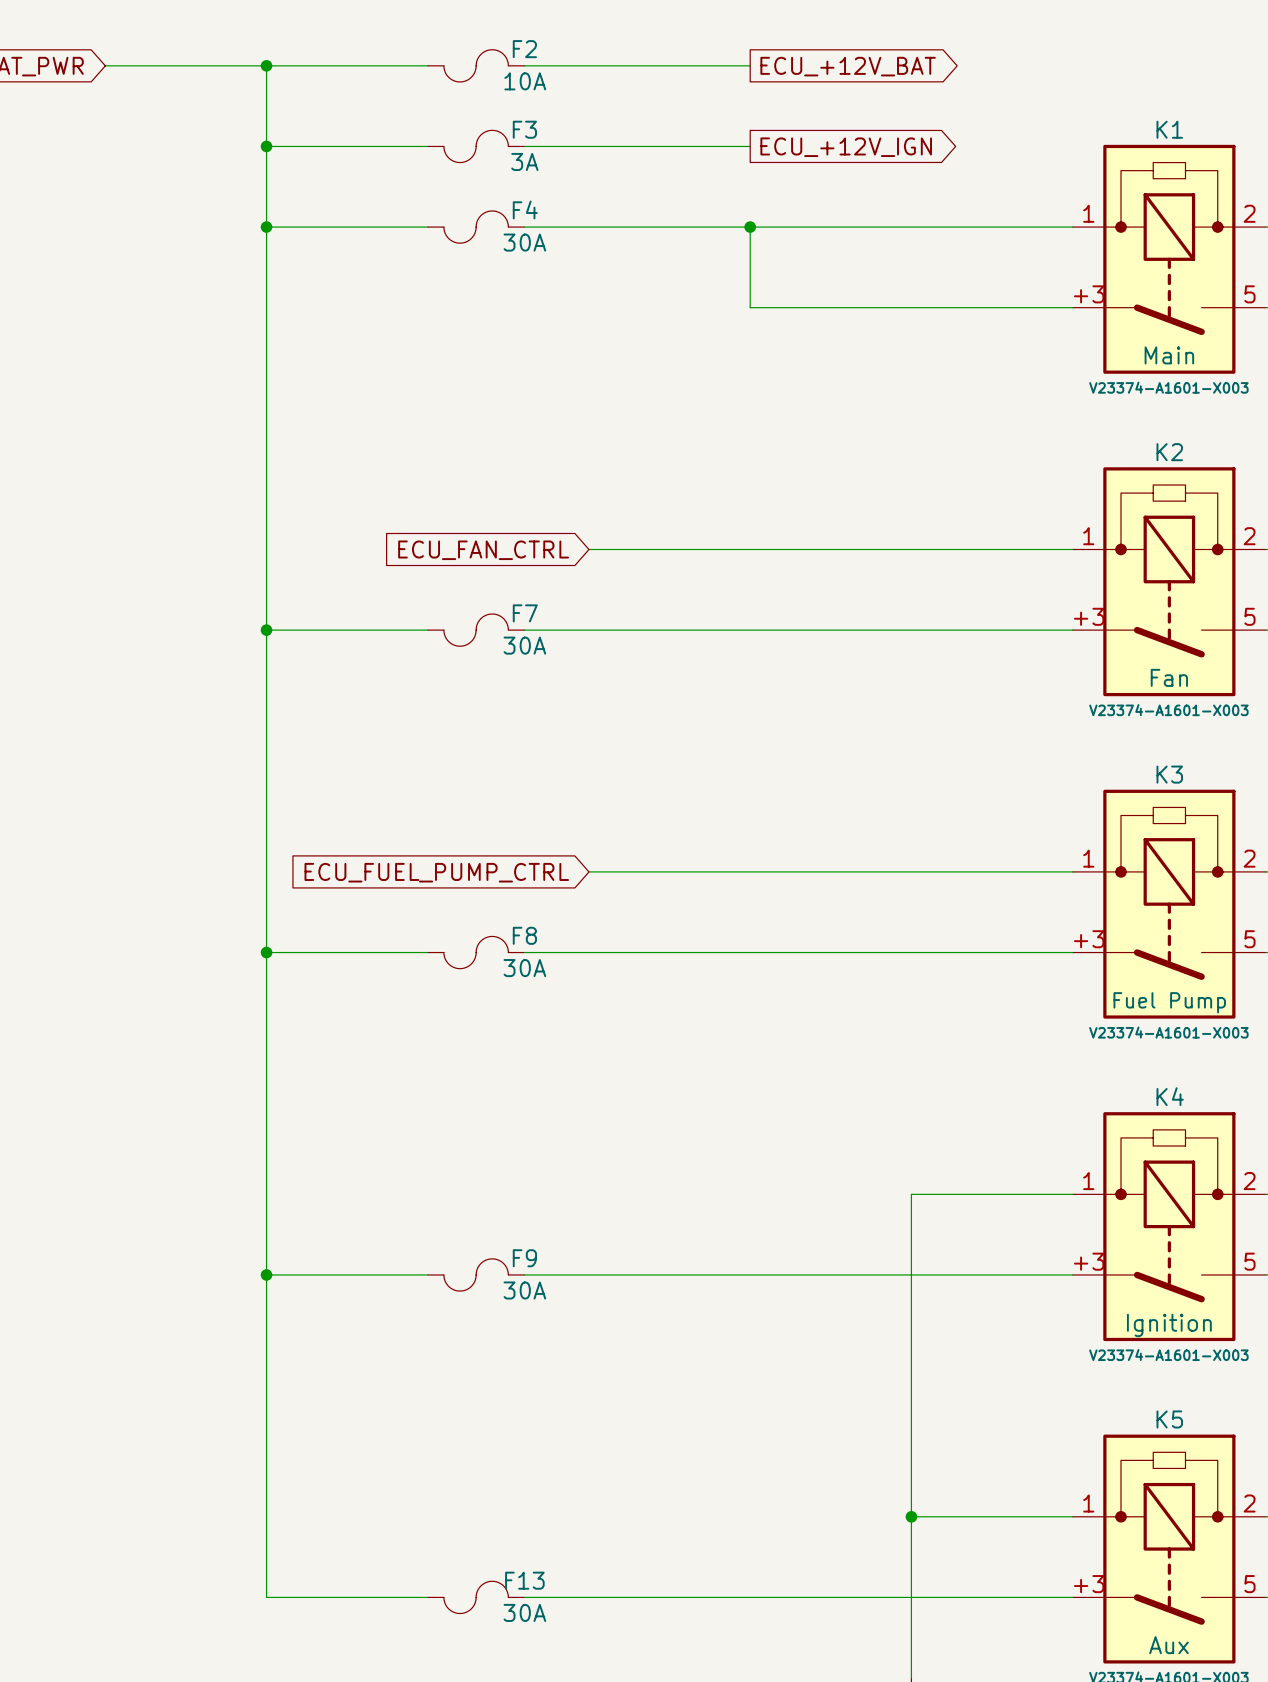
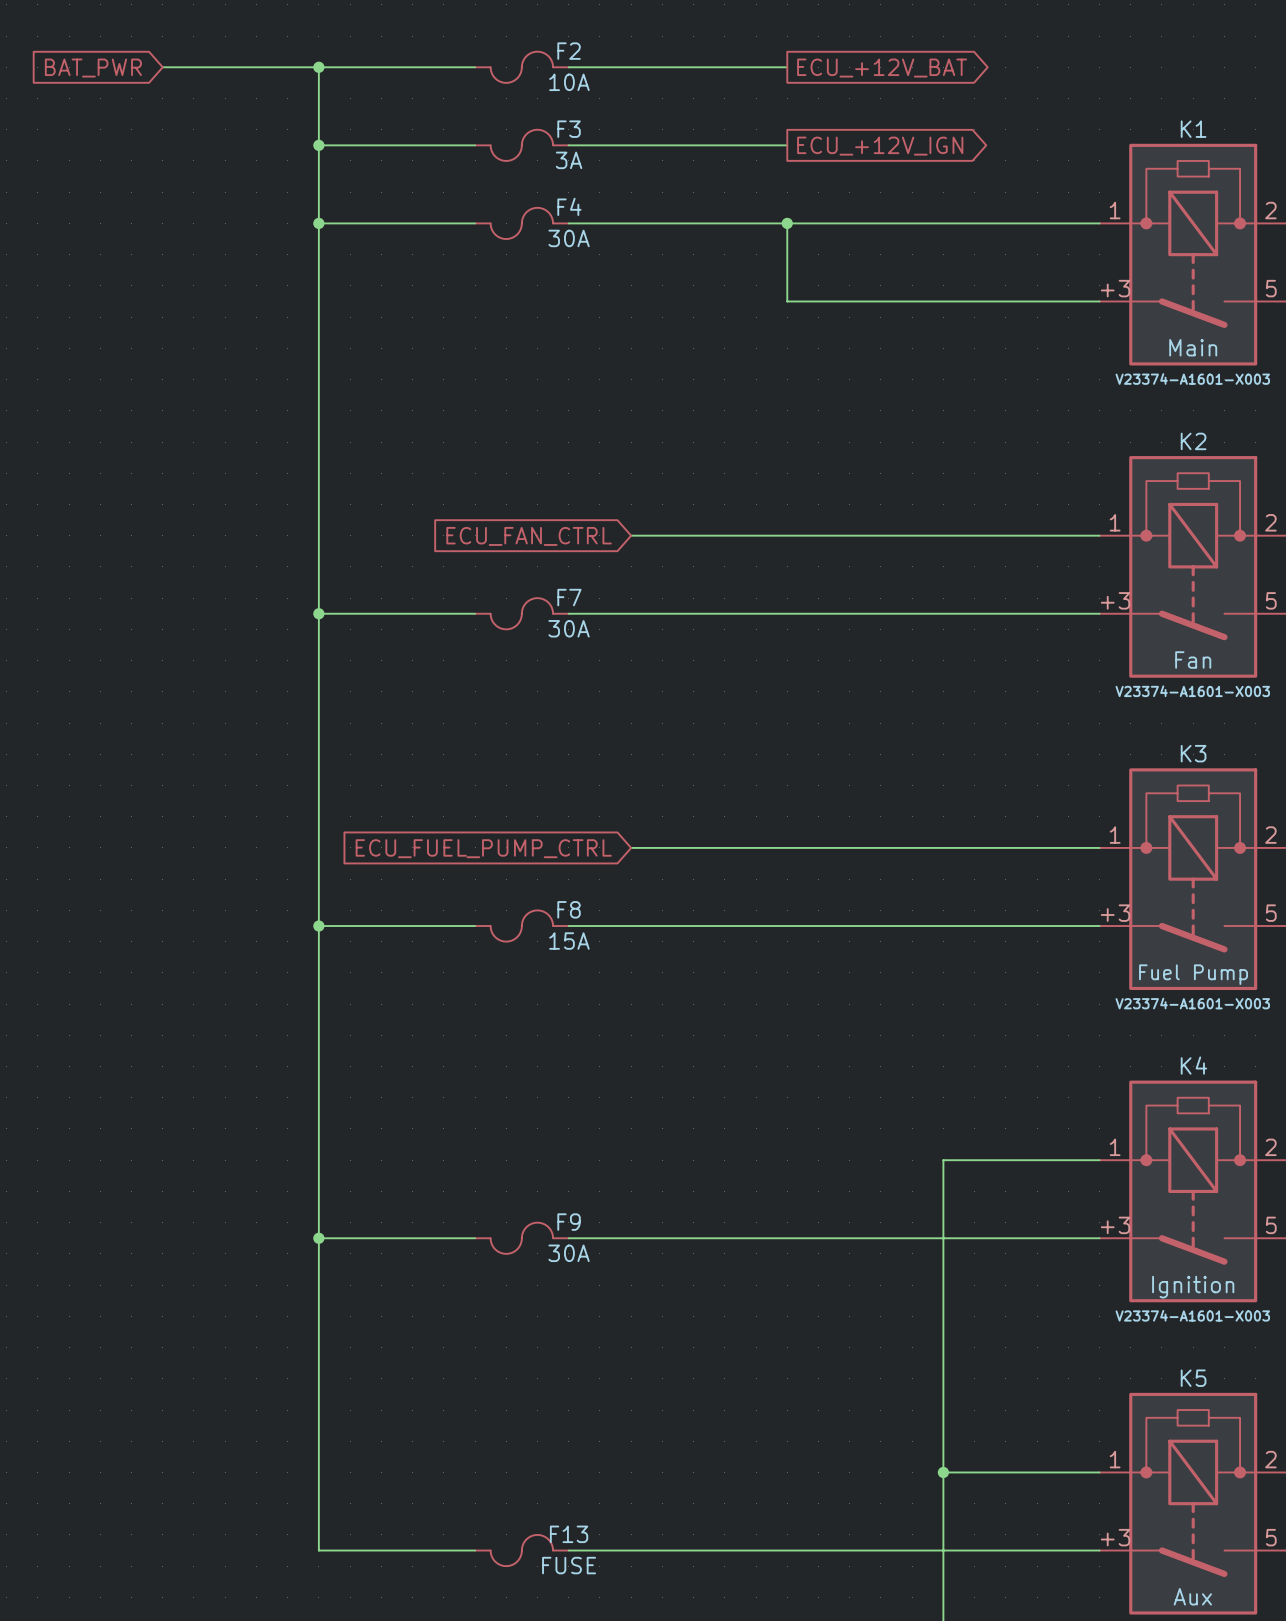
F8 value: 30A (524, 968) -> 15A (569, 941)
F13 value: 30A (524, 1612) -> FUSE (569, 1565)

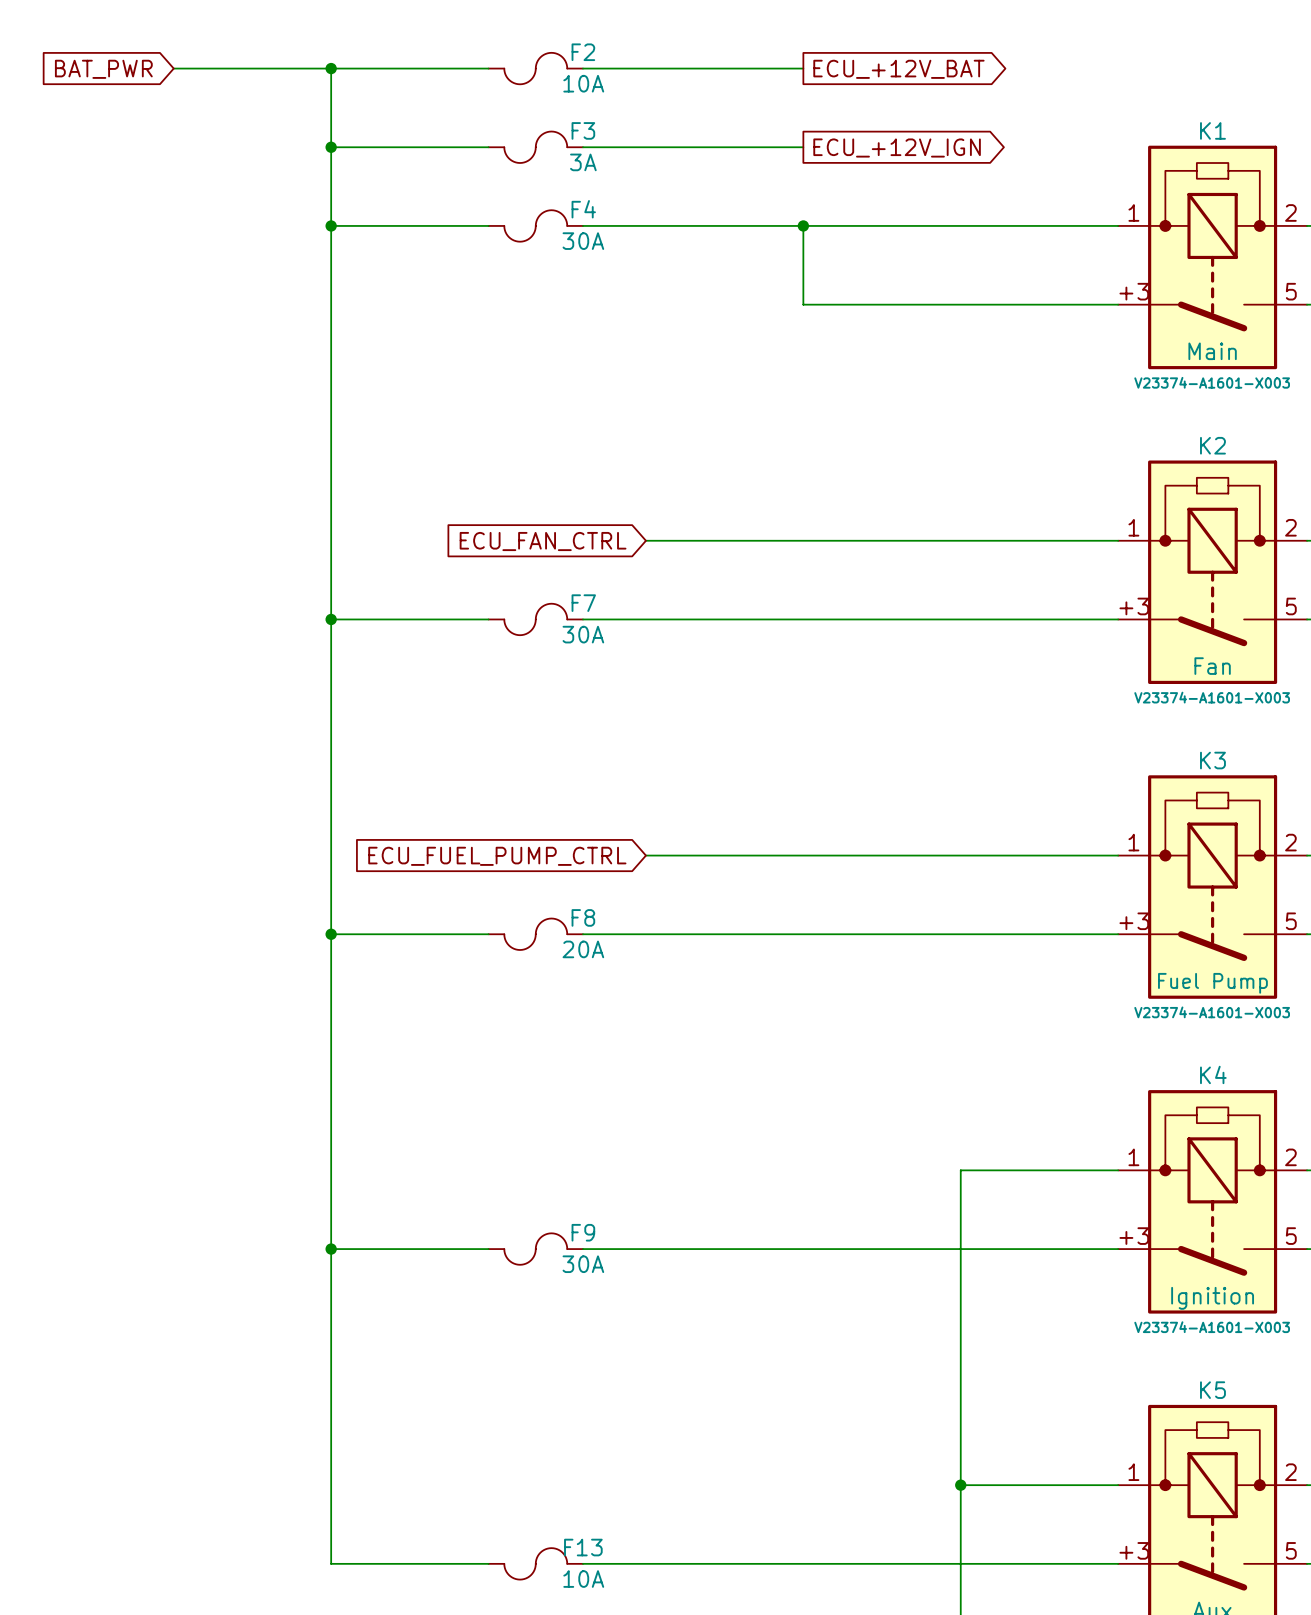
F8 value: 15A (569, 941) -> 20A (583, 949)
F13 value: FUSE (569, 1565) -> 10A (583, 1579)

